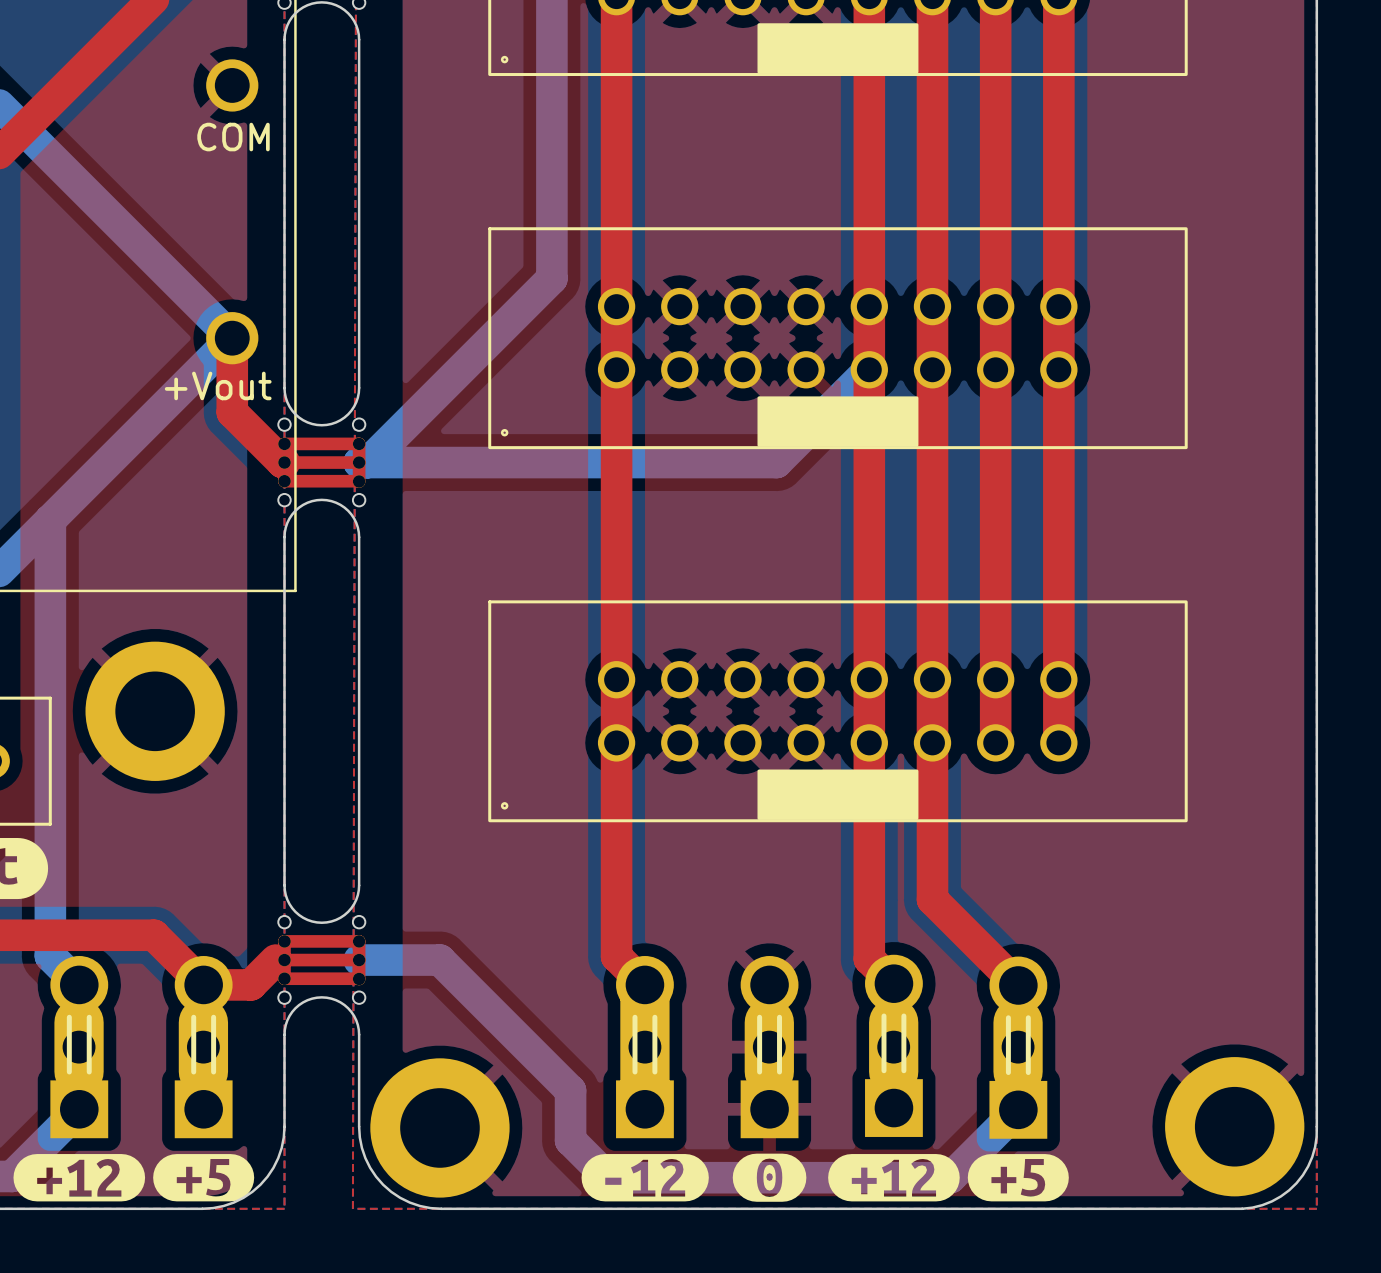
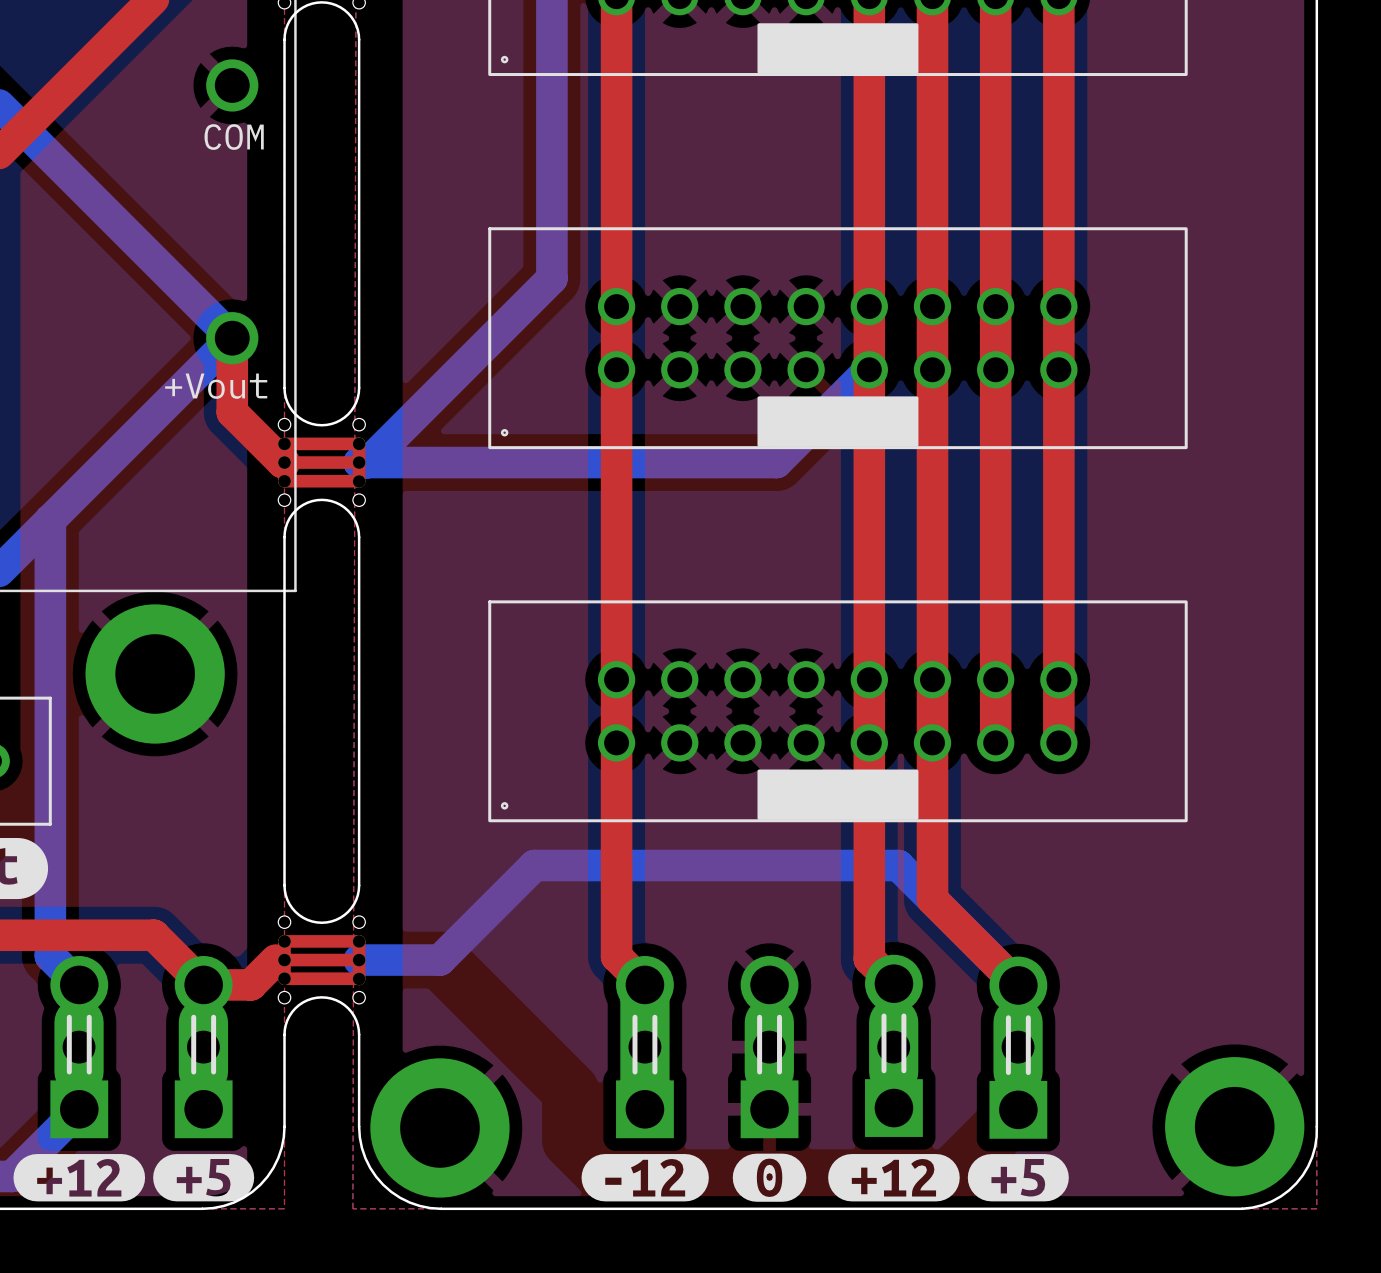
part position: (155, 711) -> (155, 674)
bottom track: (439, 960) (570, 1090) (570, 1140) (607, 1177) (950, 1177) (1018, 1109) -> (439, 960) (534, 865) (898, 865) (1018, 985)

